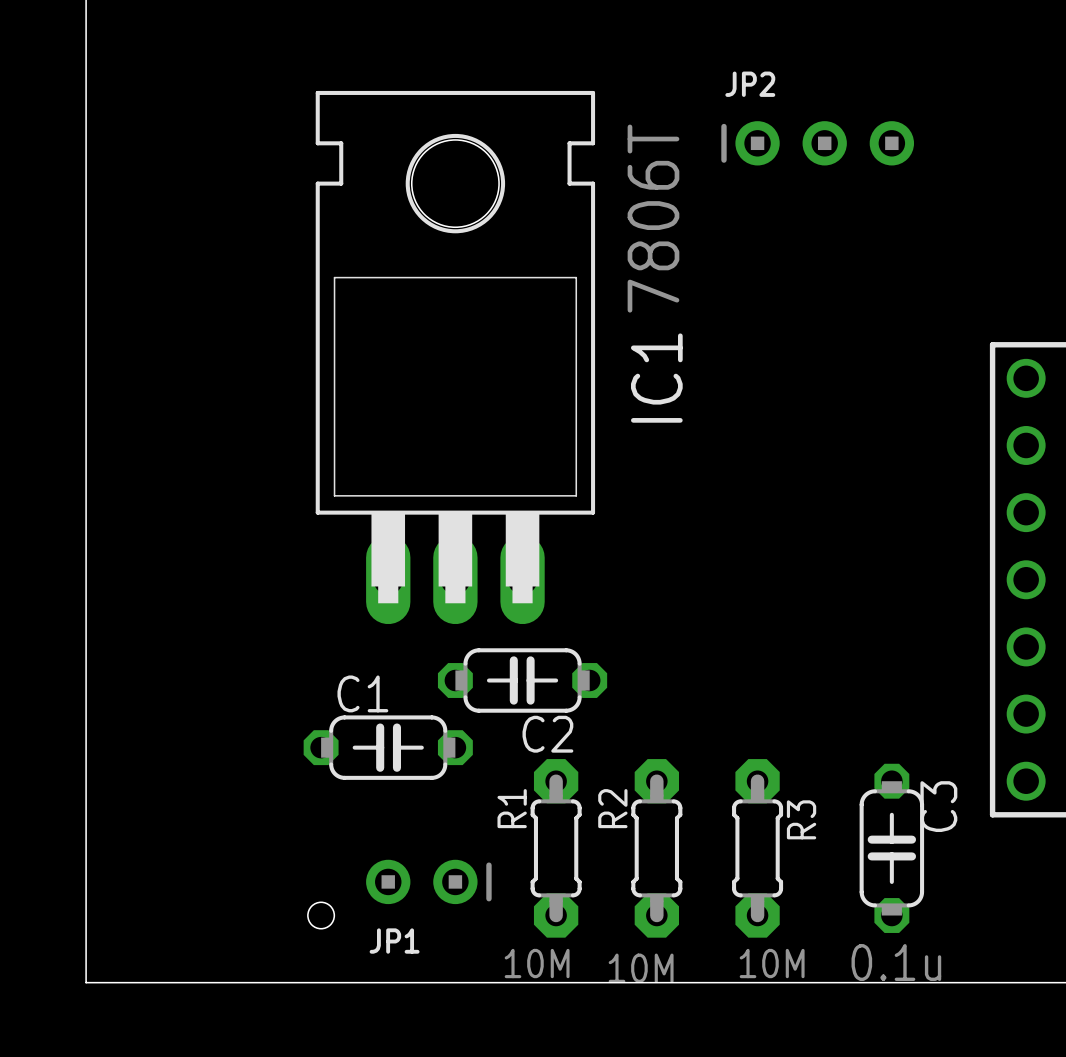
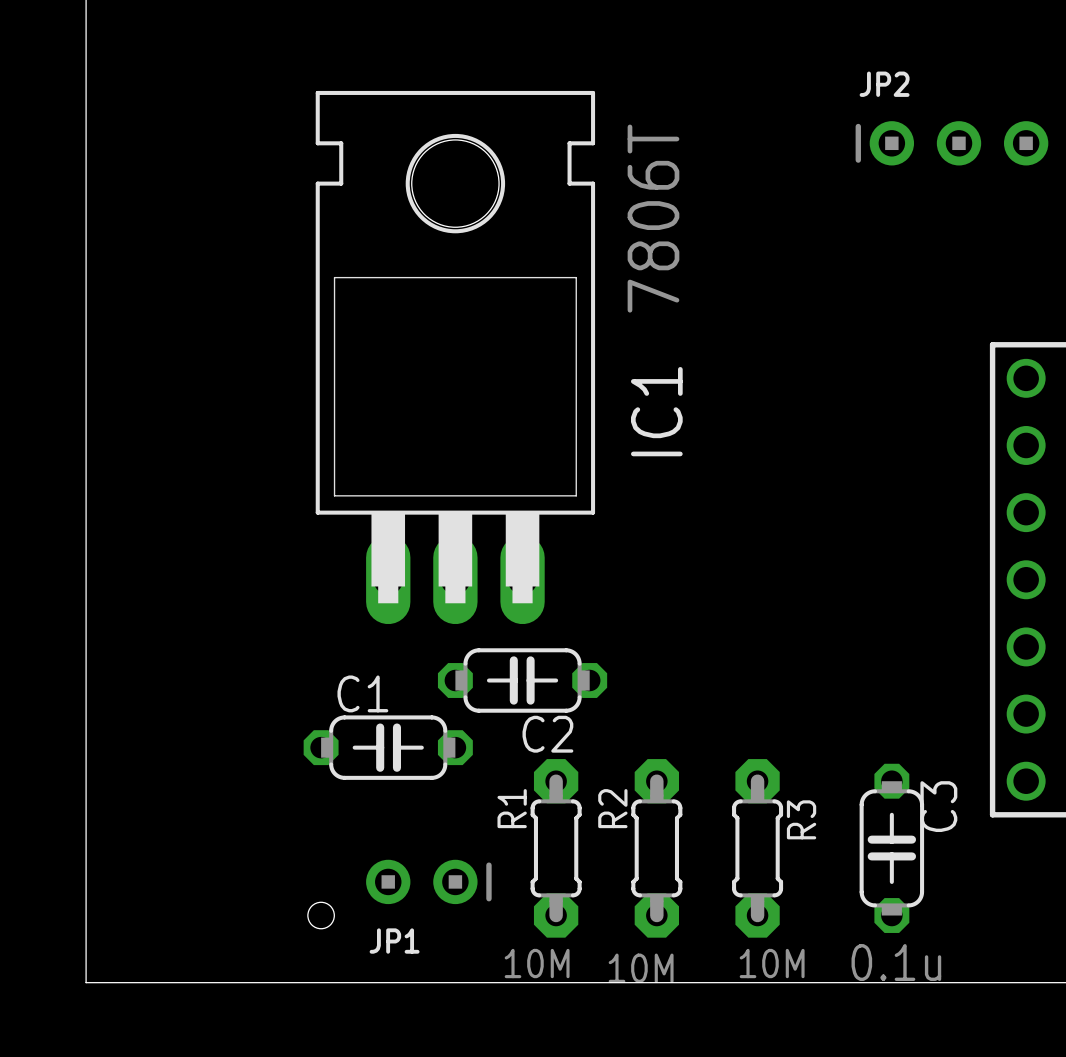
JP2 position: (817, 143) -> (951, 143)
IC1 name position: IC1 (656, 378) -> IC1 (656, 411)

